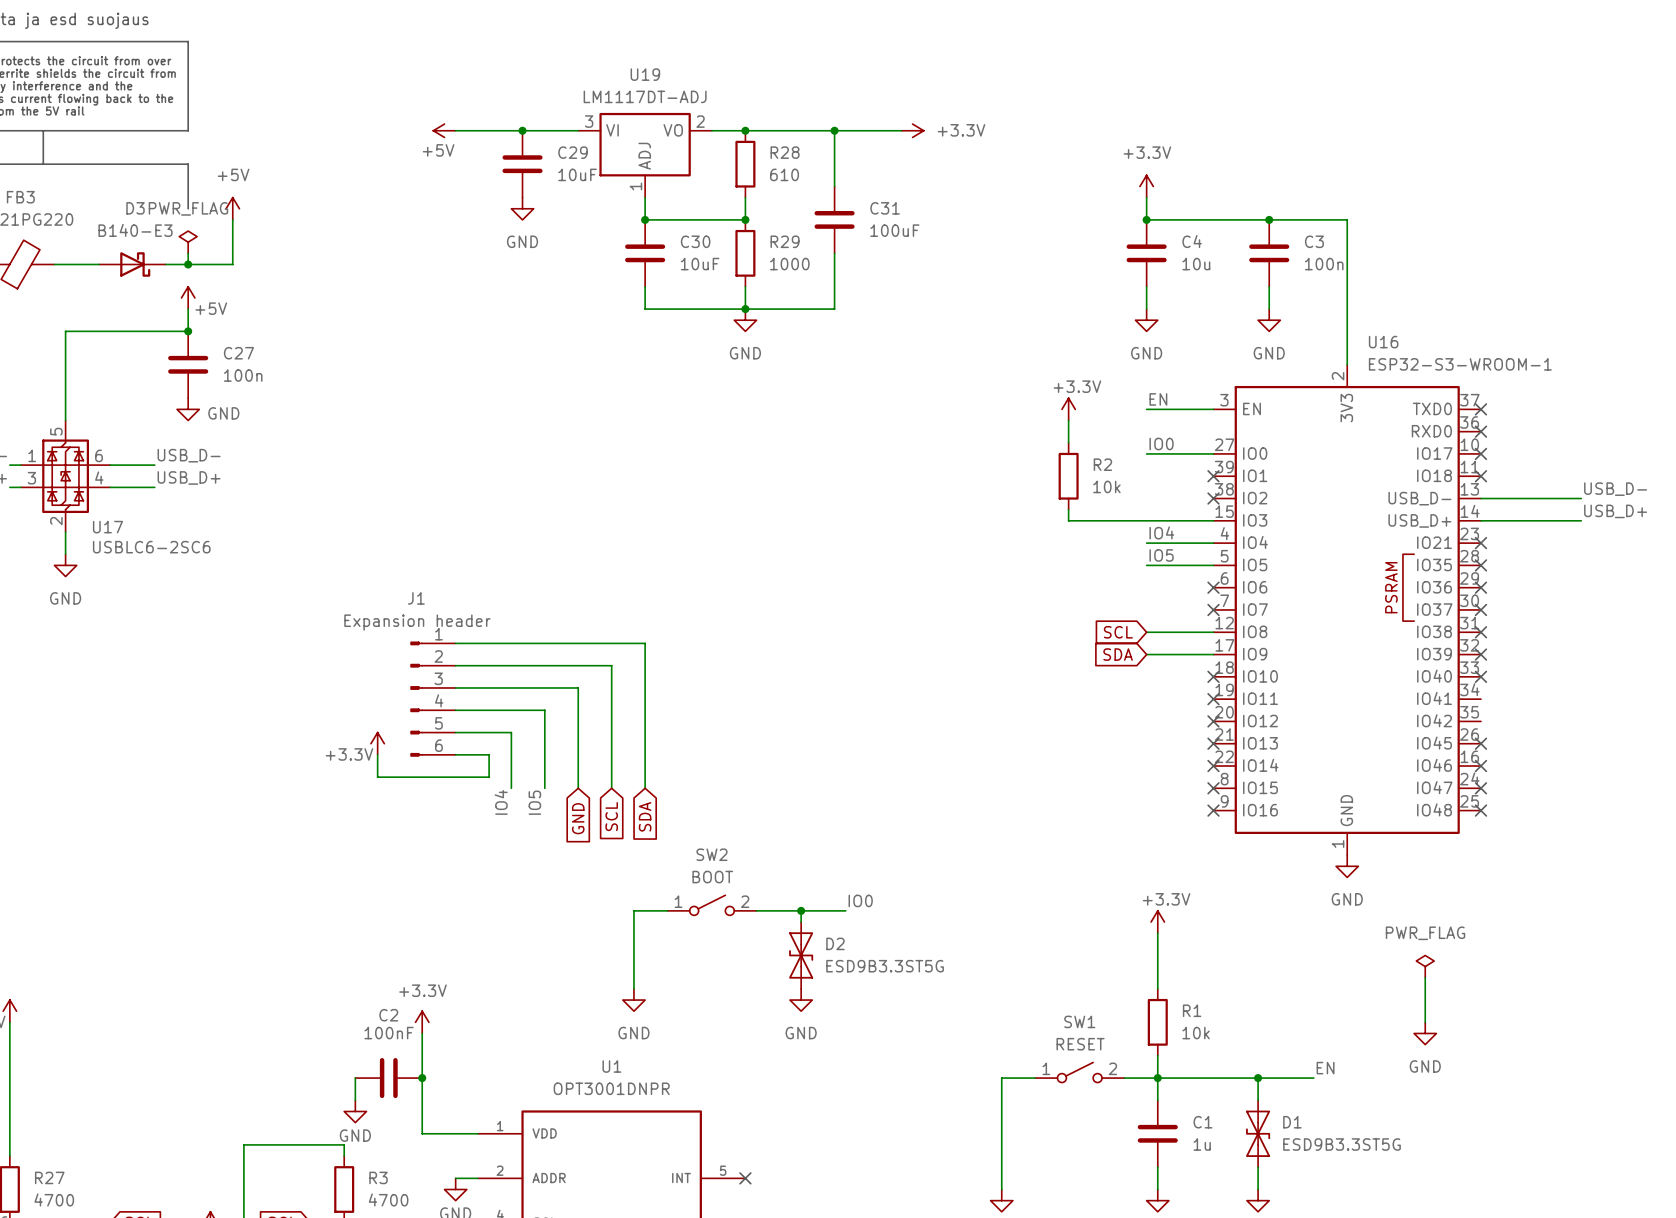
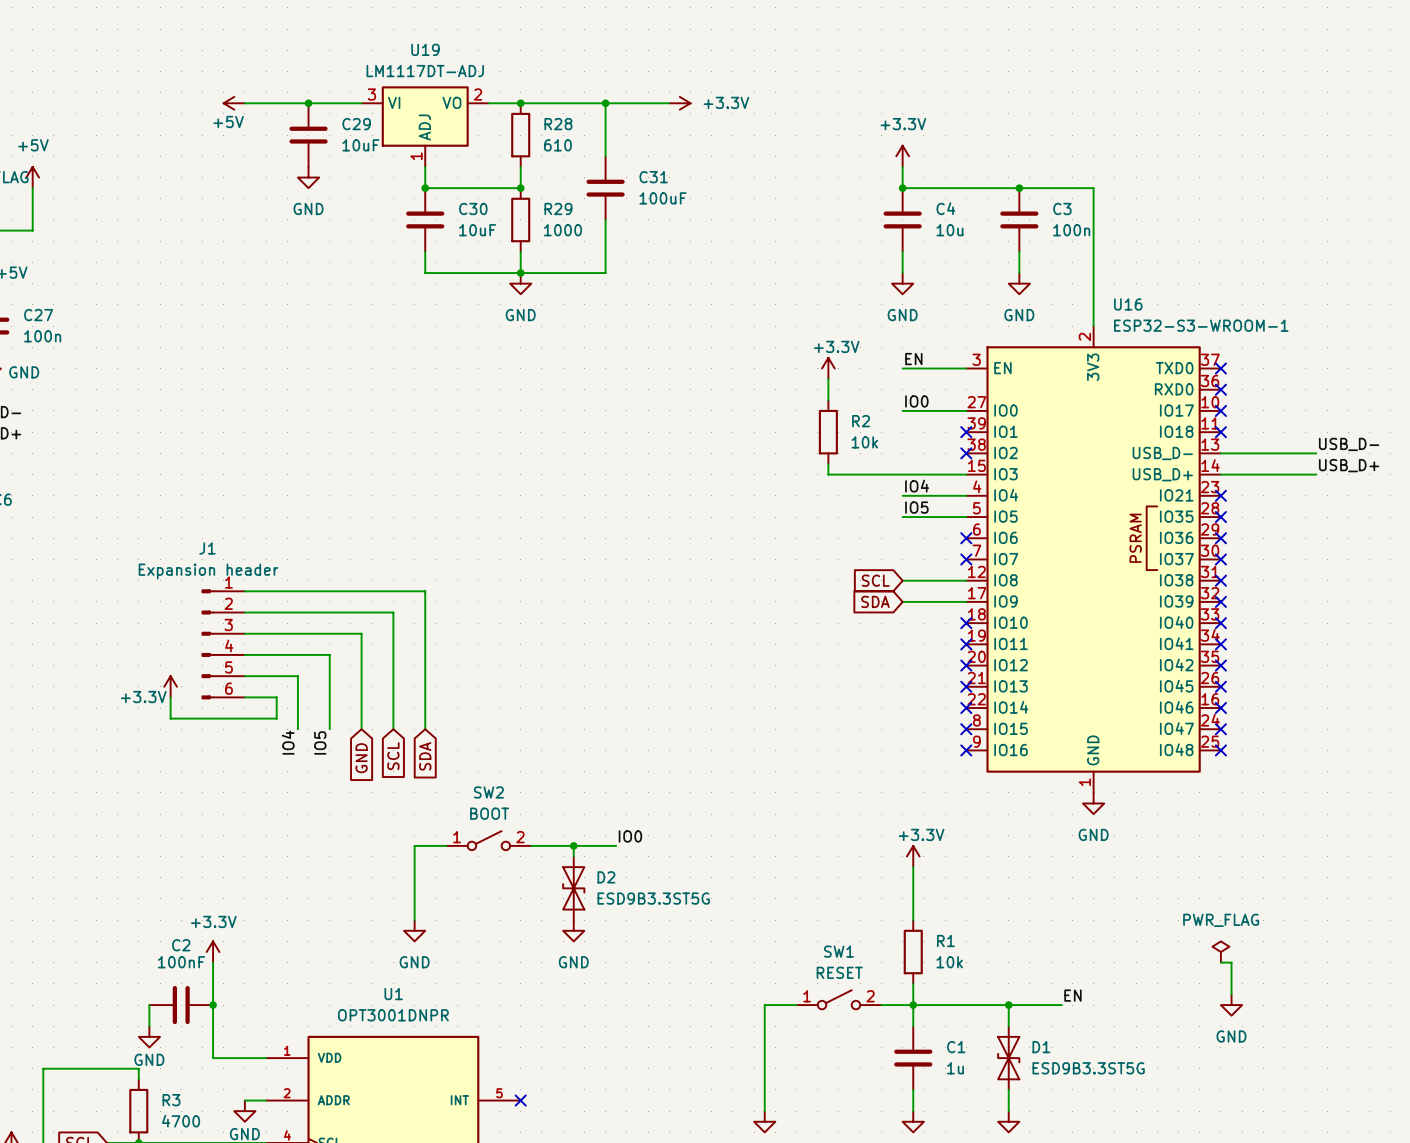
no-connect mark: none -> (1220, 644)
no-connect mark: none -> (1220, 665)
power symbol position: PWR_FLAG (1425, 966) -> PWR_FLAG (1220, 952)
wire: (1425, 977) (1425, 1022) -> none
power symbol position: GND (1425, 1033) -> GND (1231, 1005)
wire: none -> (1220, 962) (1231, 962) (1231, 994)

